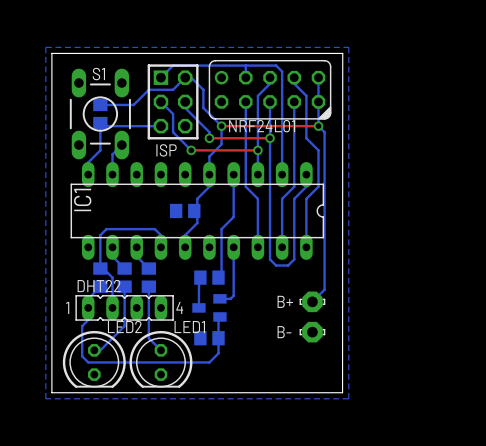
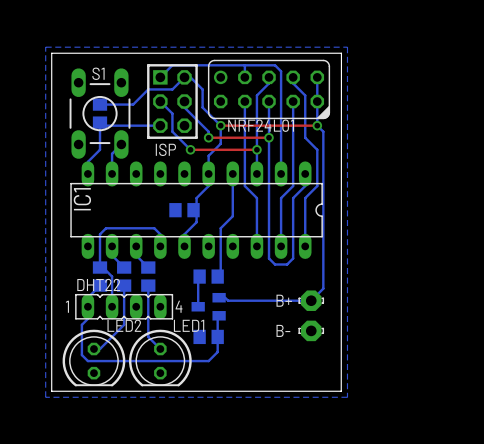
bottom track: (233, 247) (233, 295) (230, 298) (219, 298) -> none
bottom track: none -> (225, 297) (228, 300) (311, 300)

